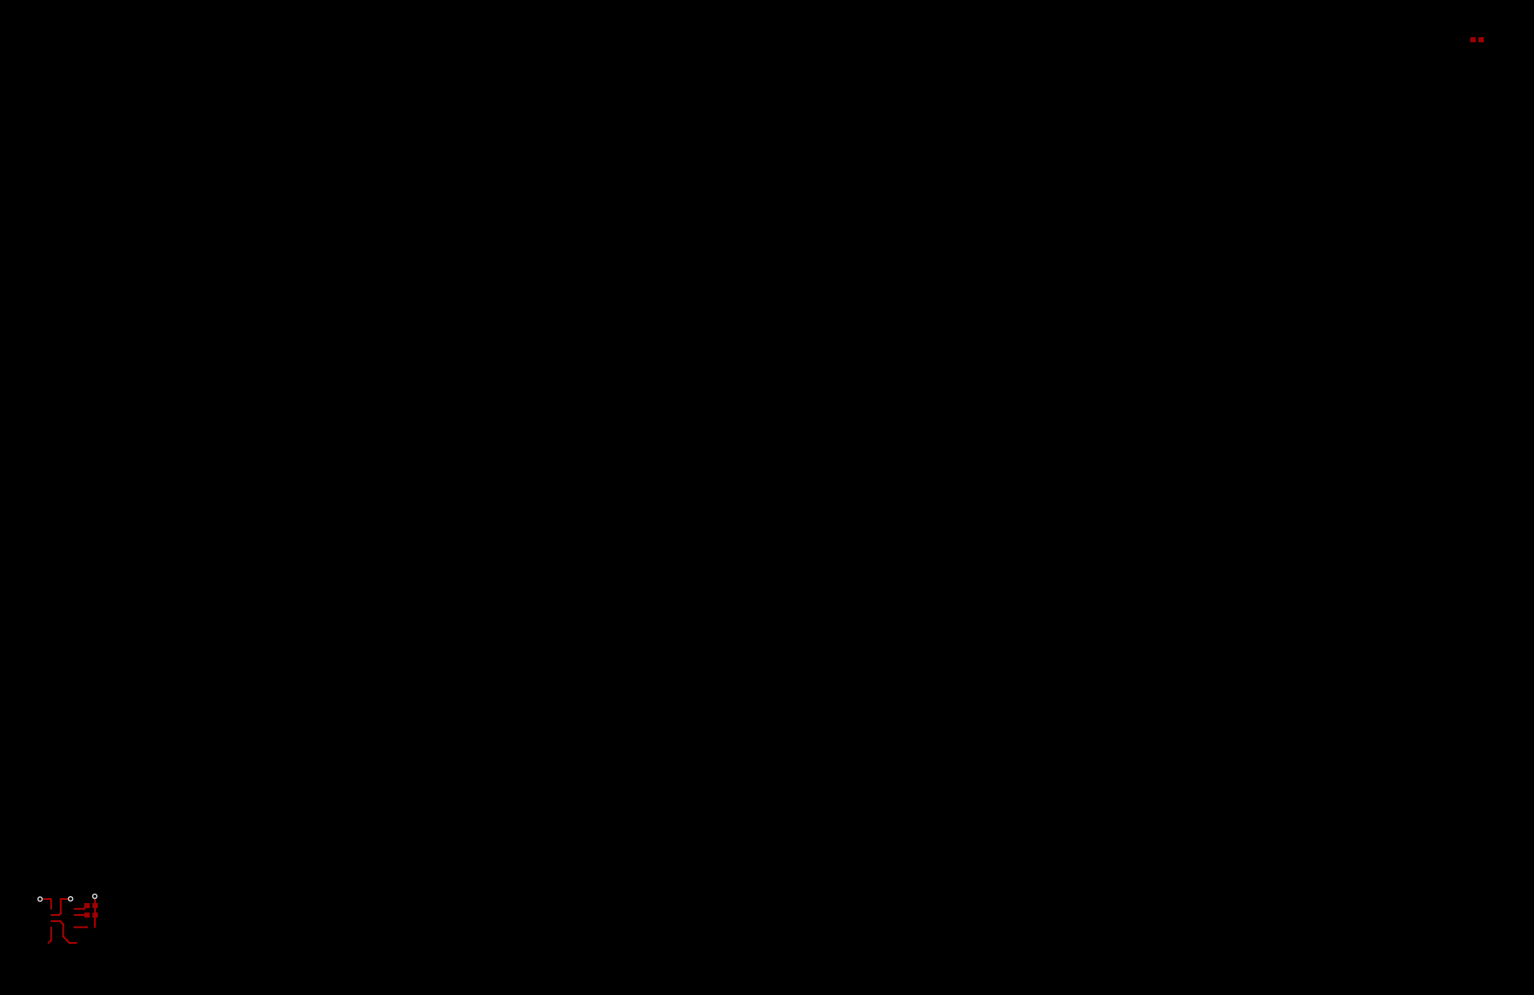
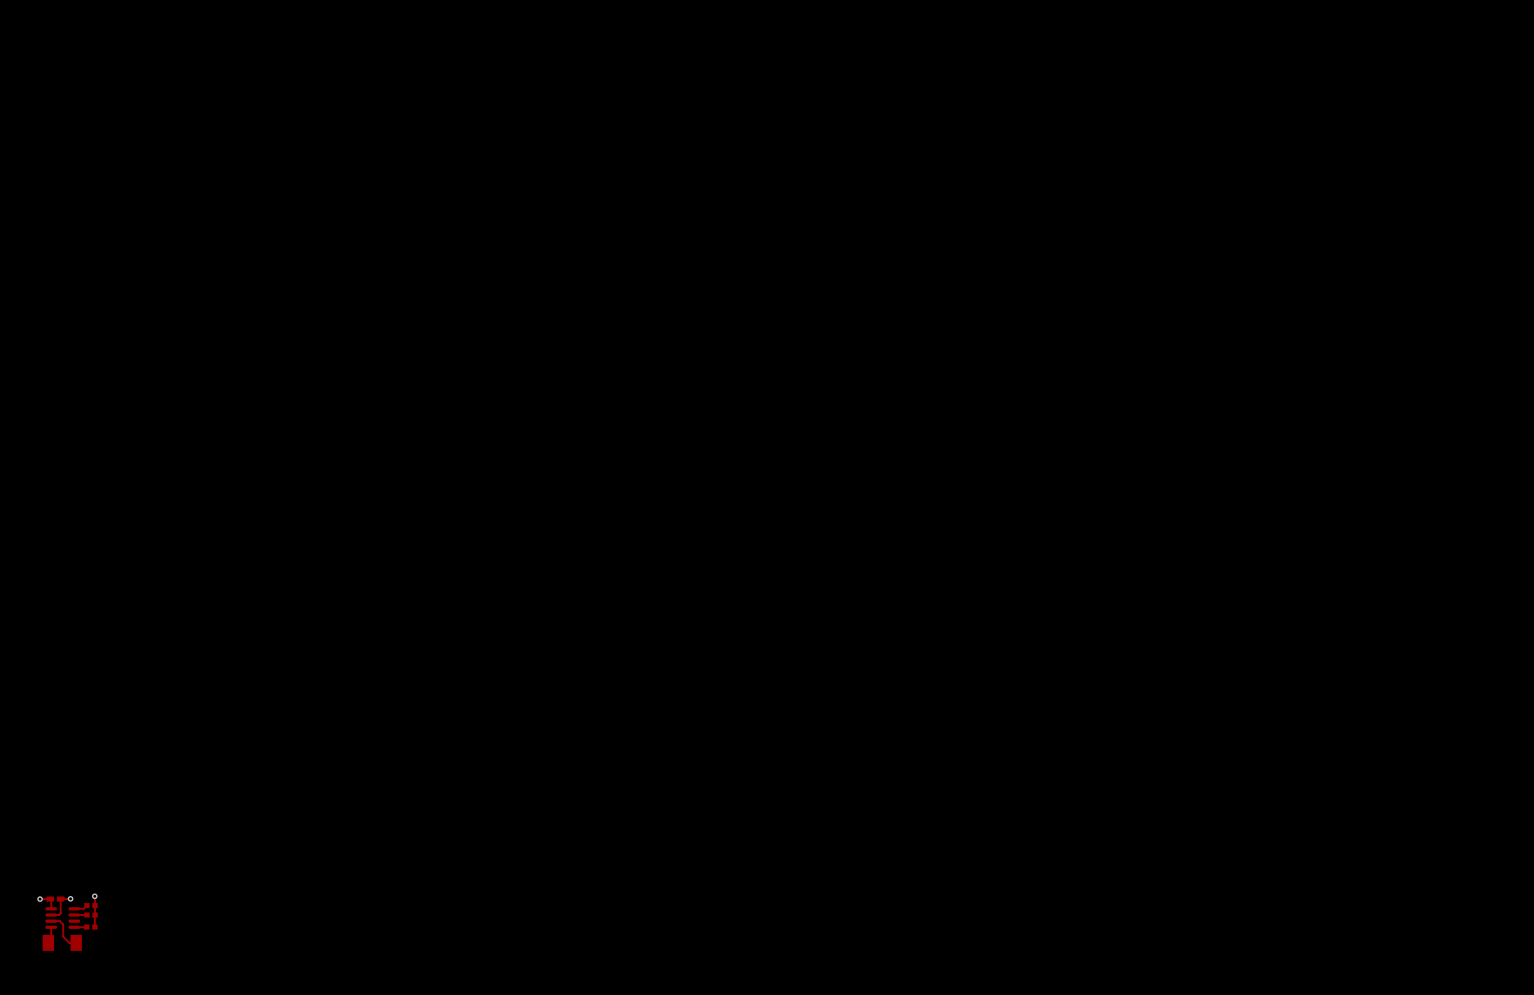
part: (1476, 39) -> none
part: none -> (55, 899)
part: none -> (62, 918)
part: none -> (90, 927)
part: none -> (62, 942)

